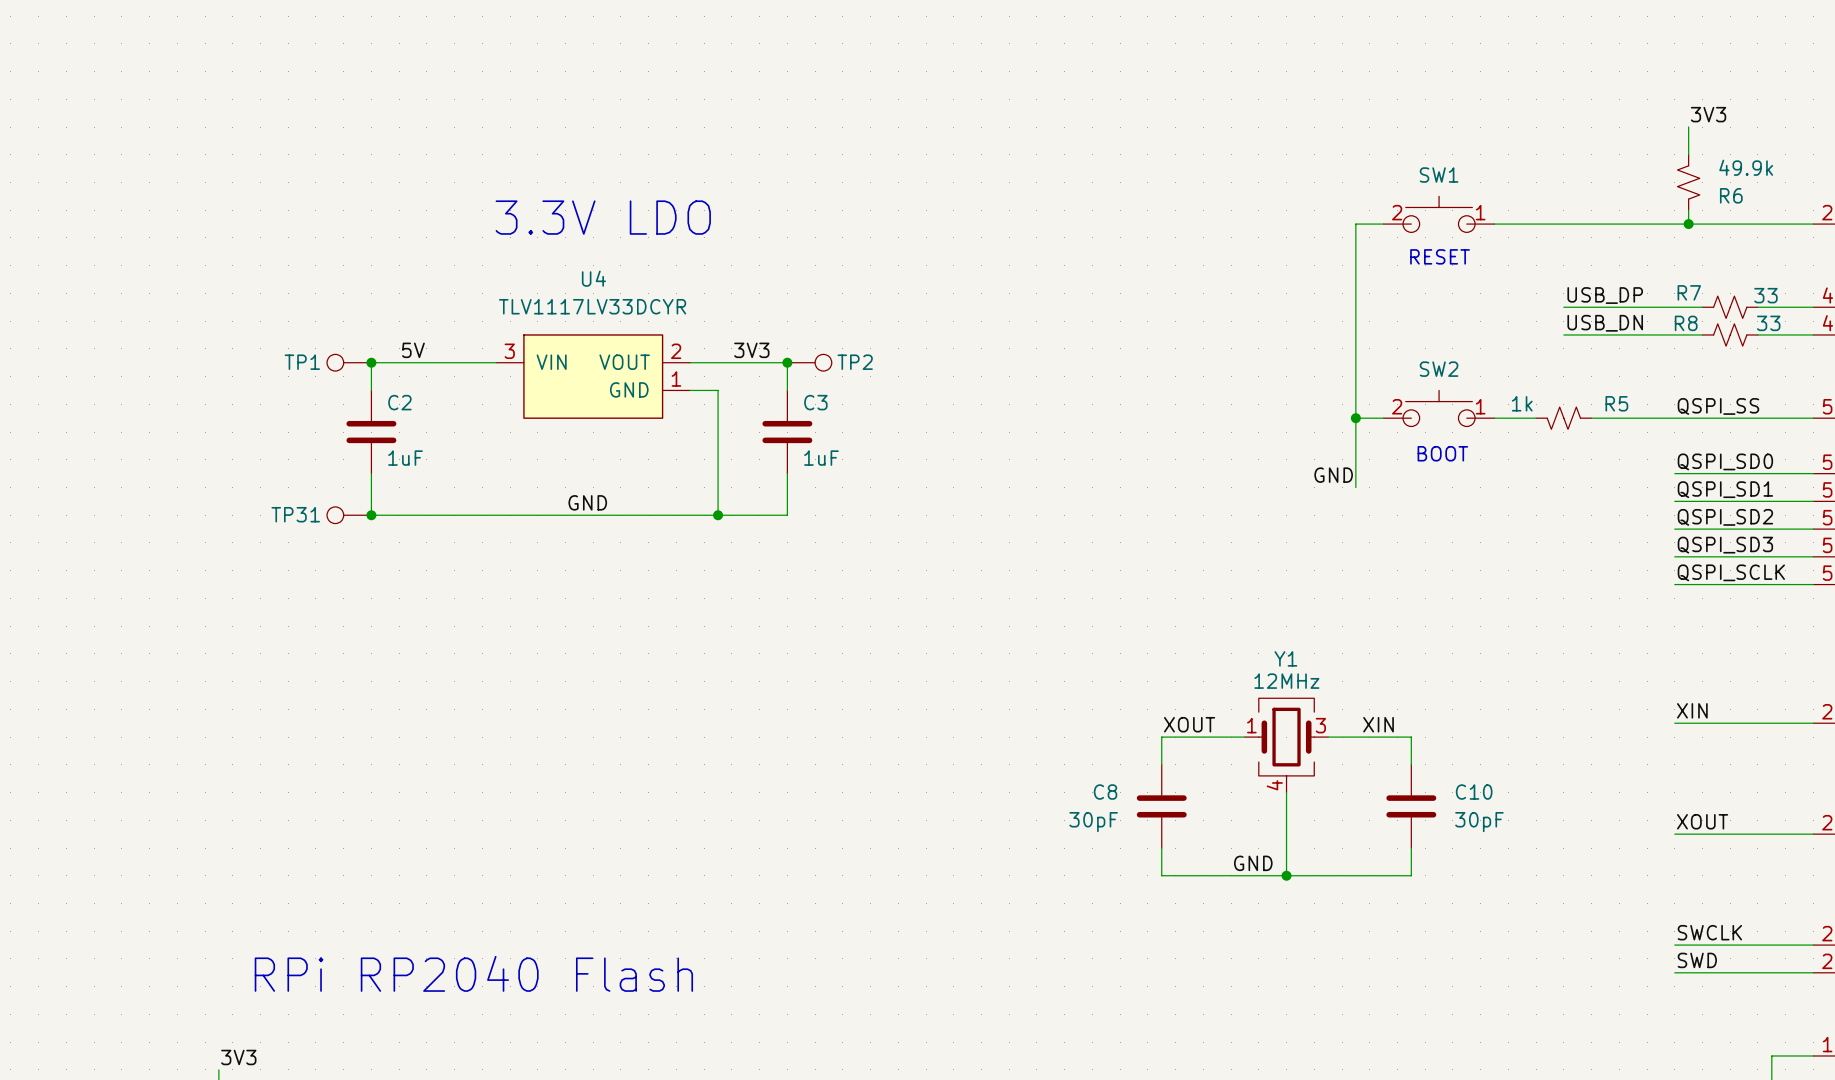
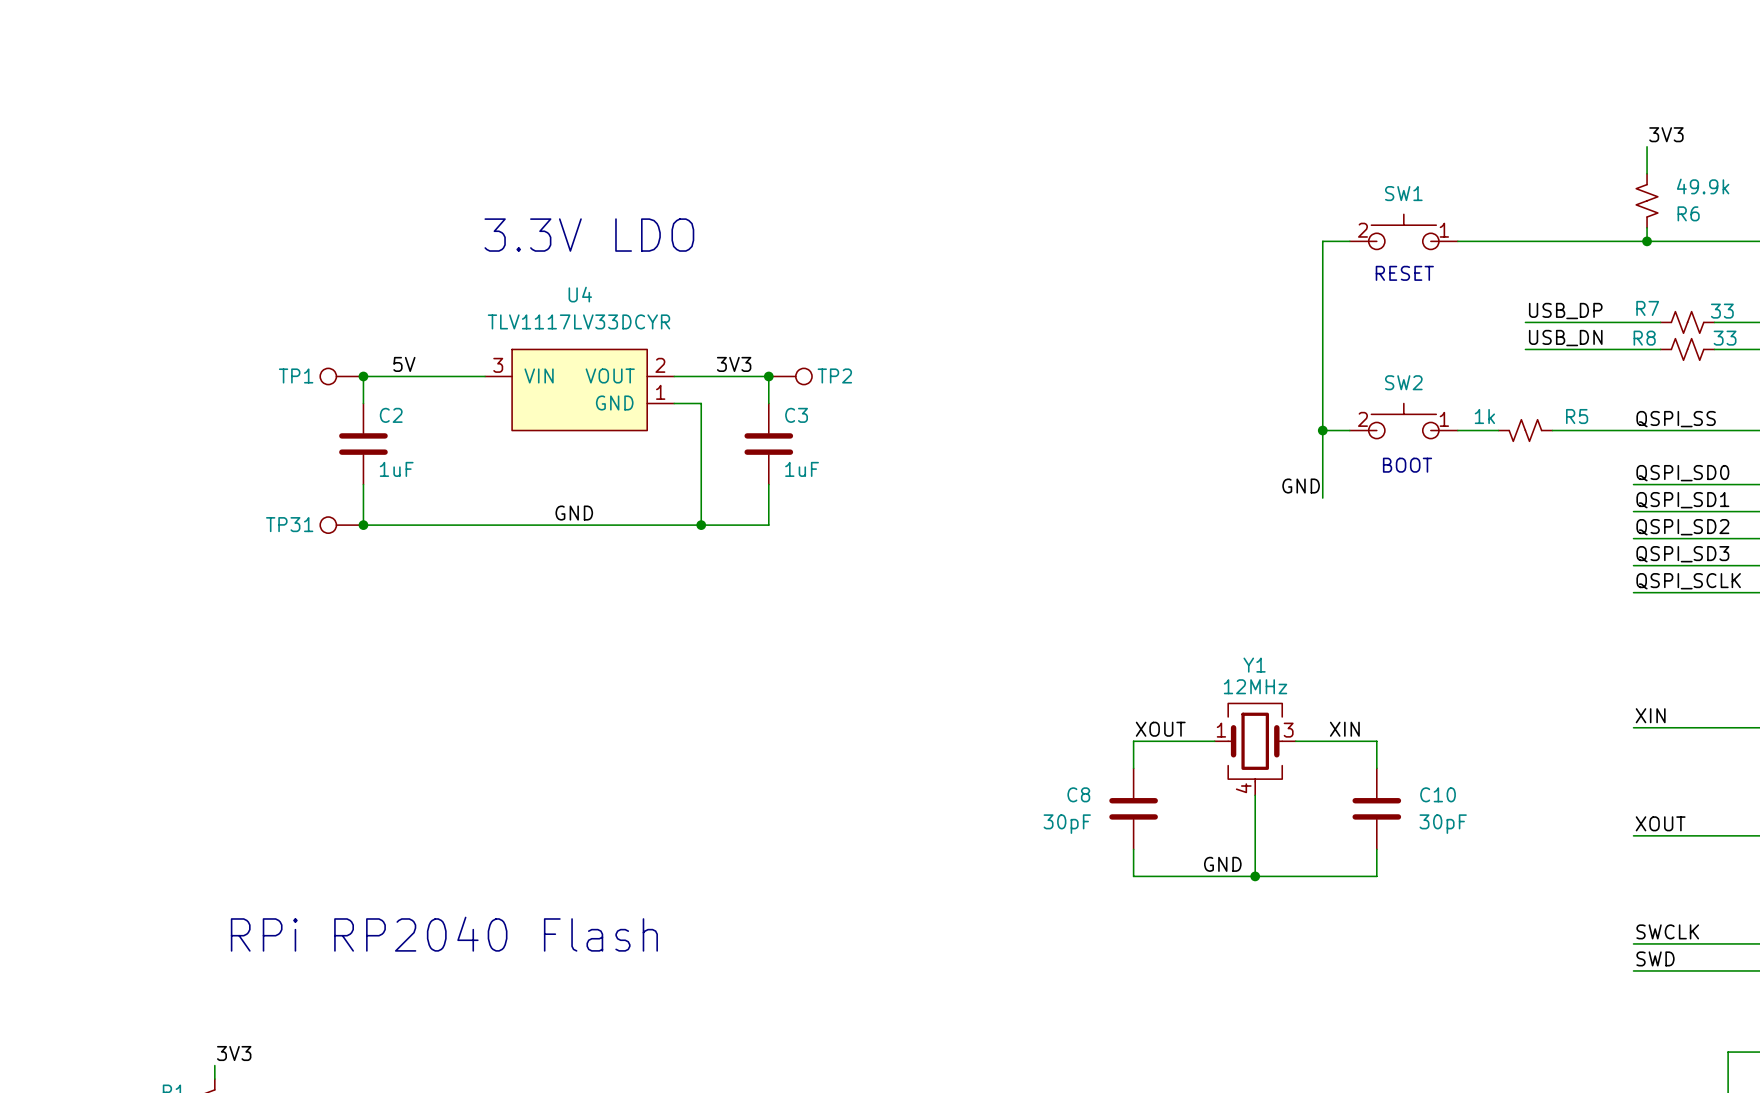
text position: RPi RP2040 Flash (473, 973) -> RPi RP2040 Flash (444, 934)

